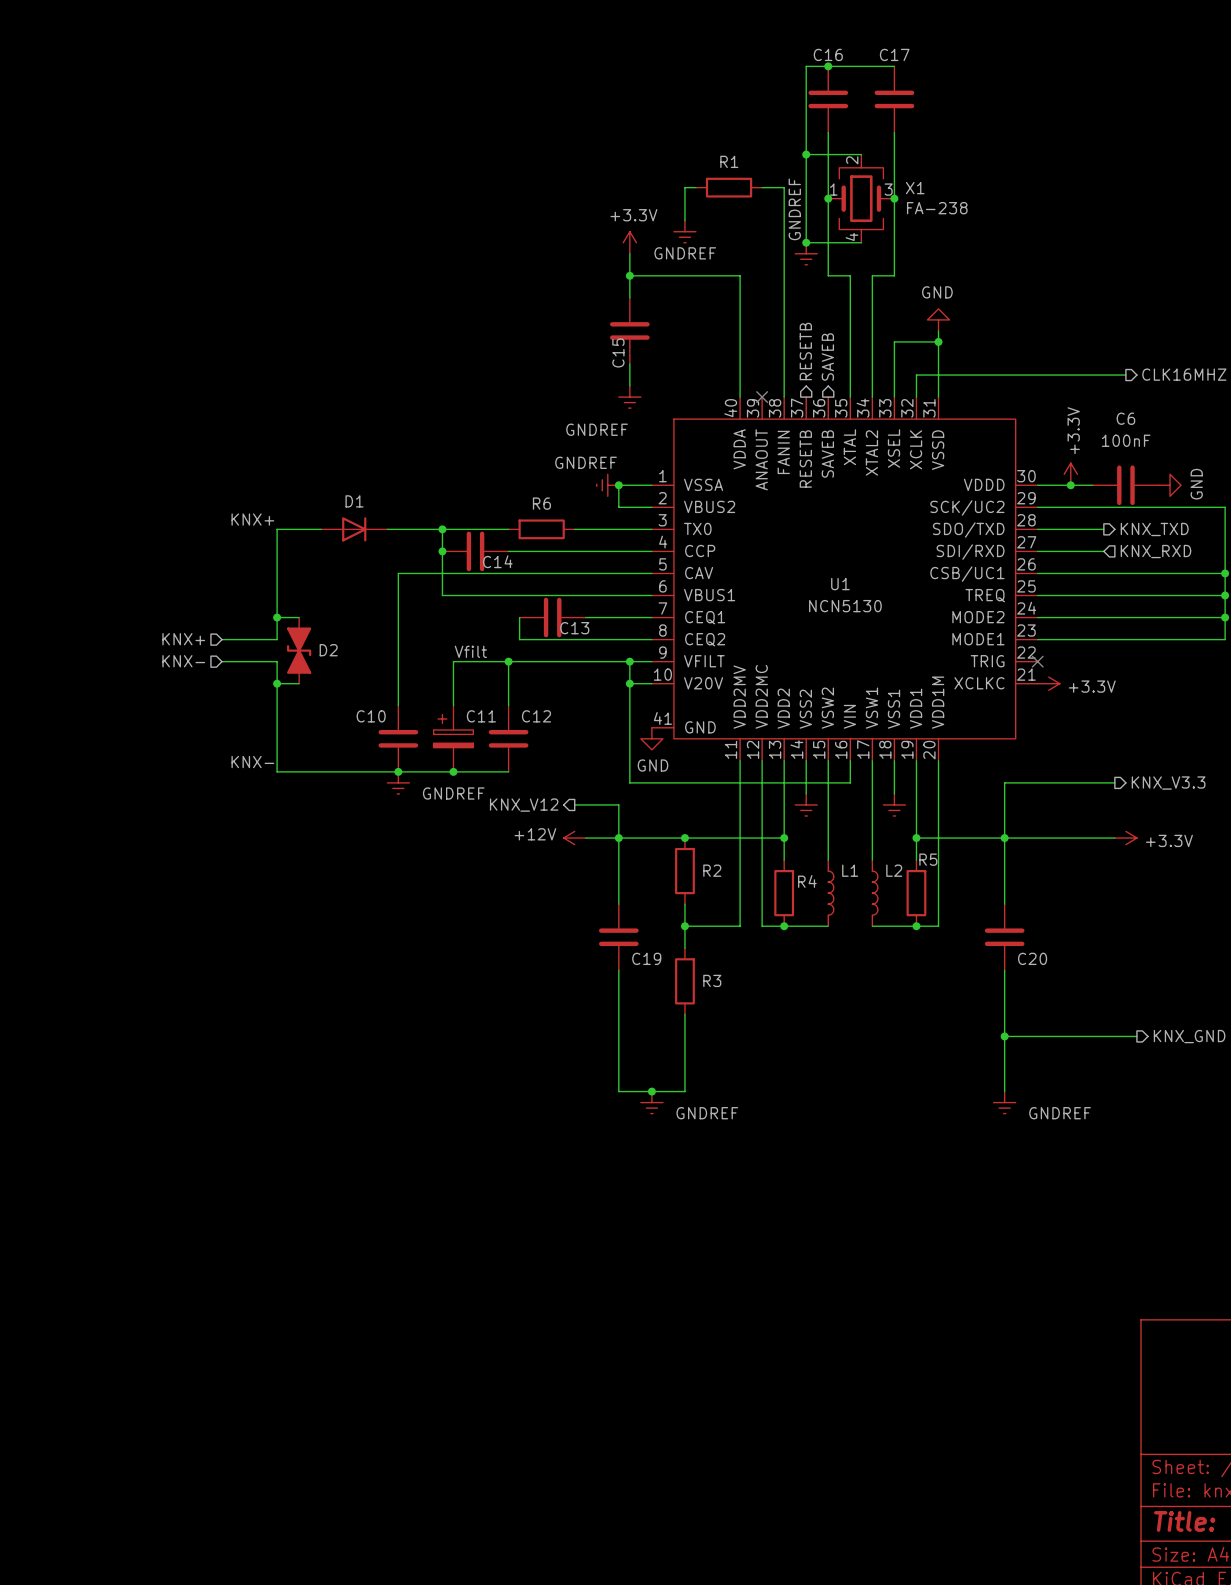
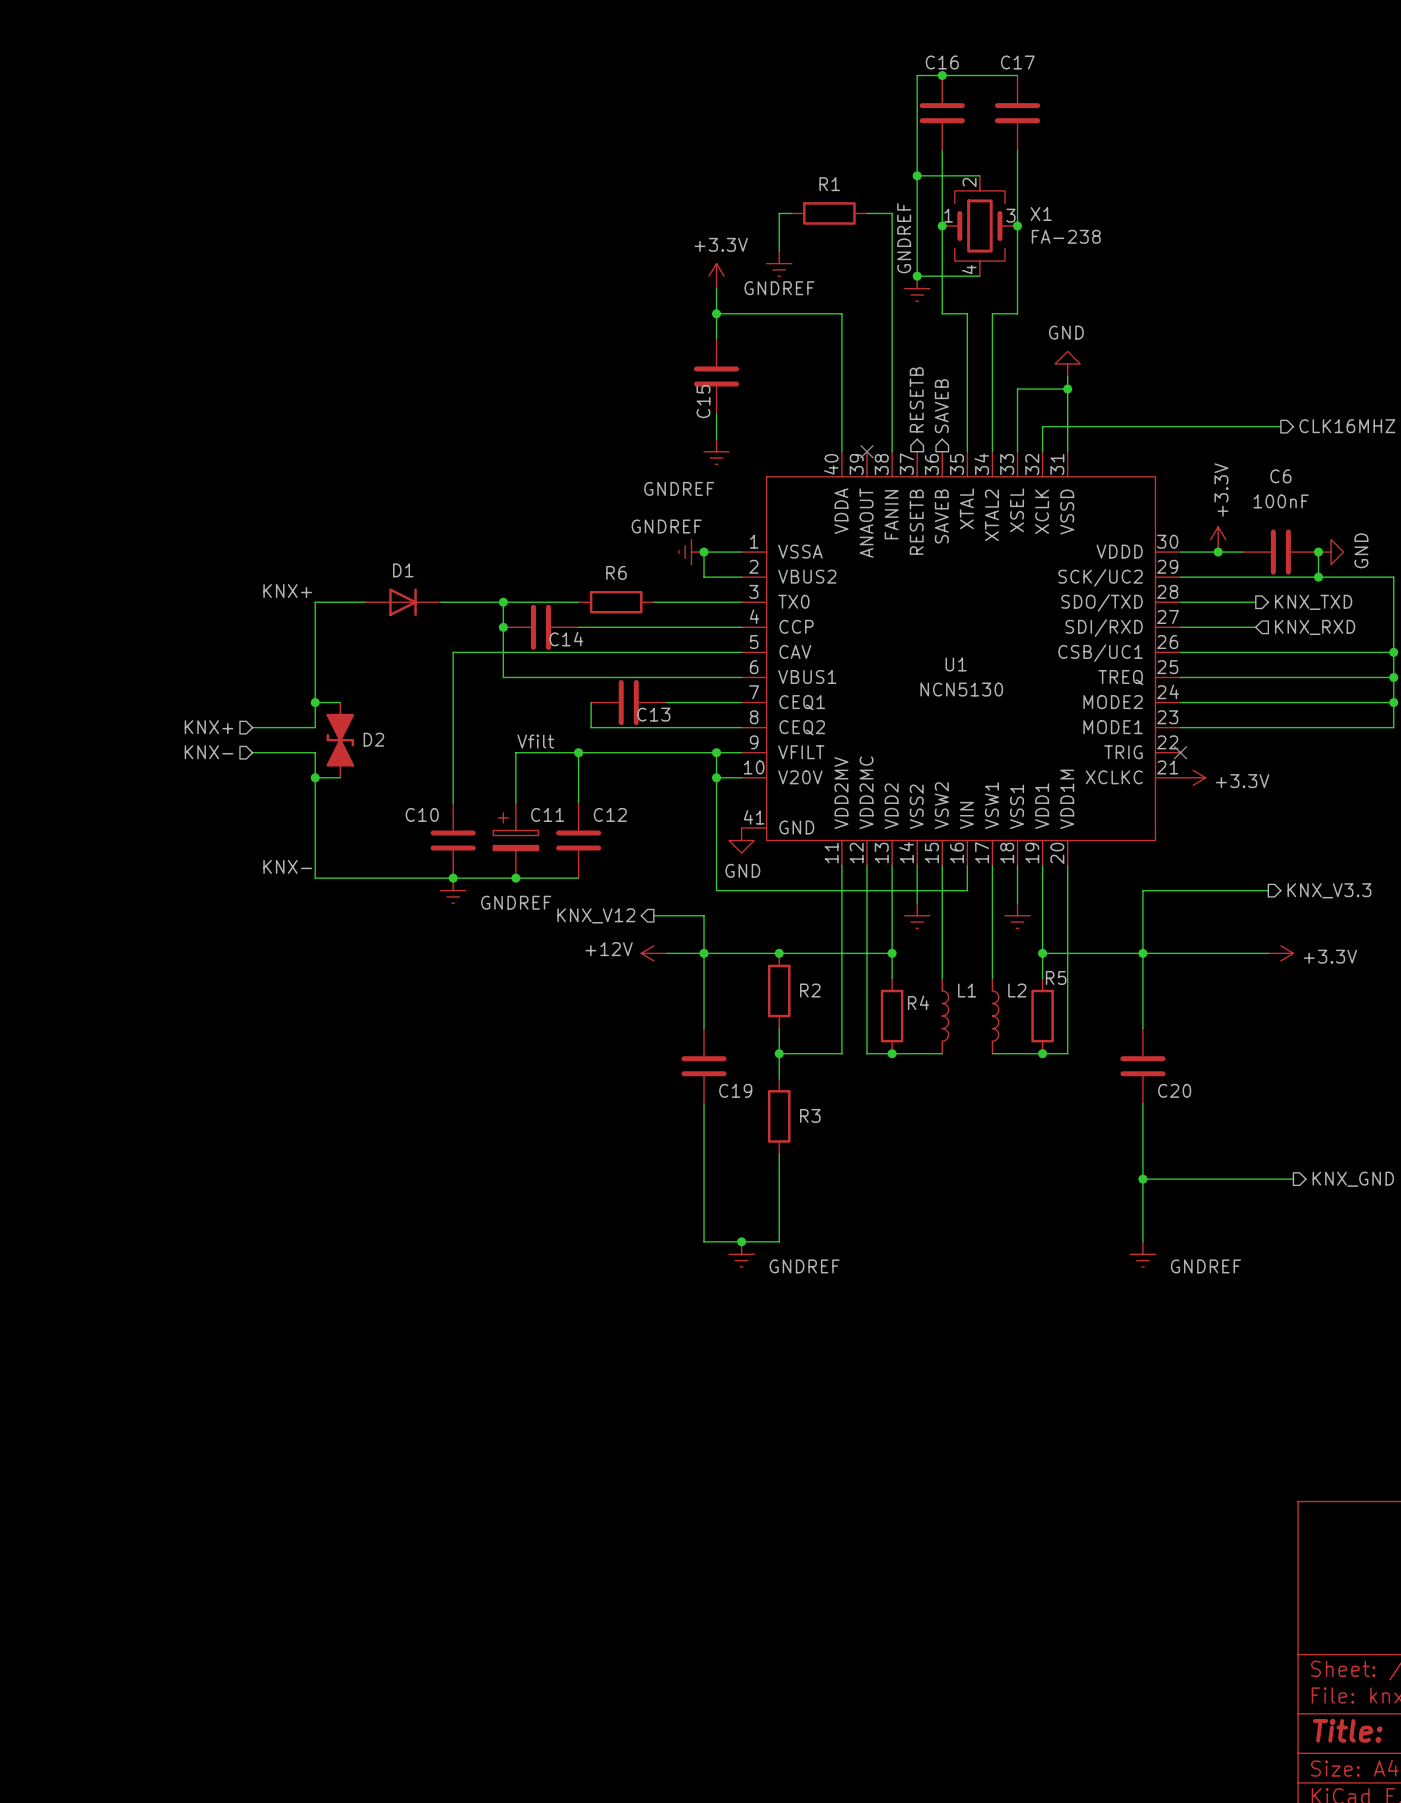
wire: none -> (1318, 552) (1318, 577)
junction: none -> (1318, 552)
junction: none -> (1318, 577)

